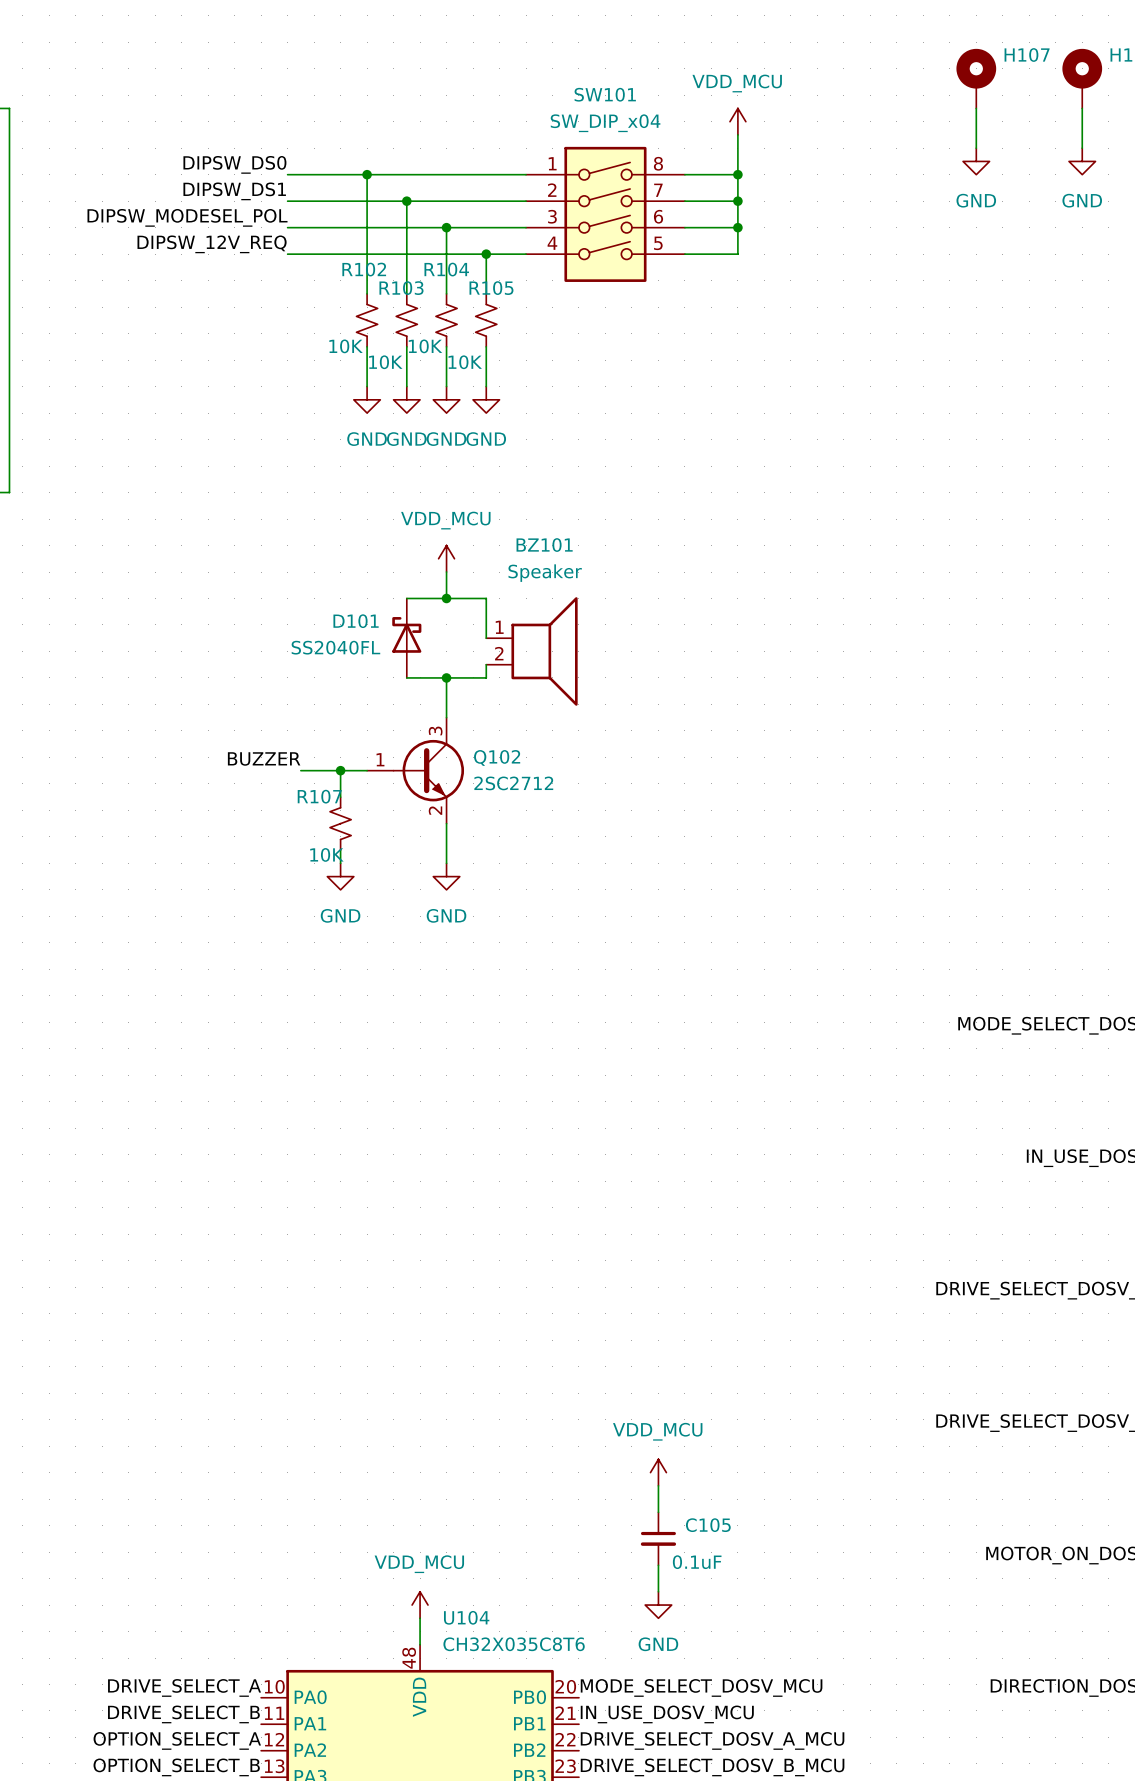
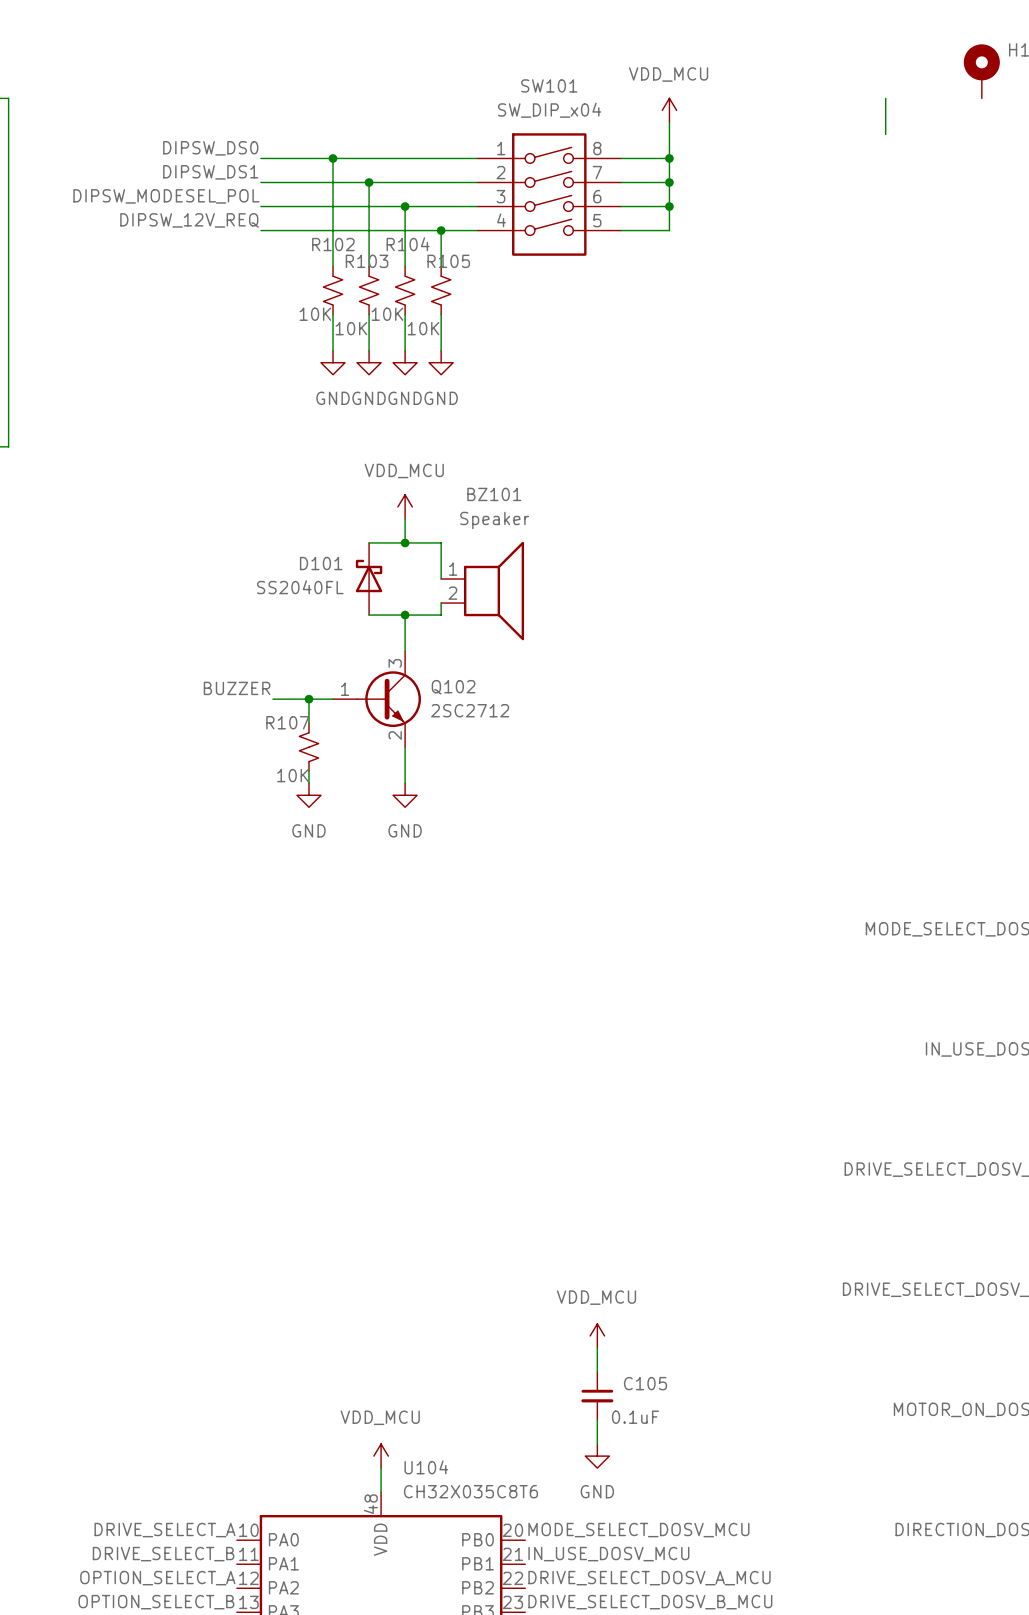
H107: (976, 78) -> none
wire: (1082, 108) (1082, 148) -> none
power symbol: GND (976, 161) -> none
power symbol: GND (1082, 161) -> none

